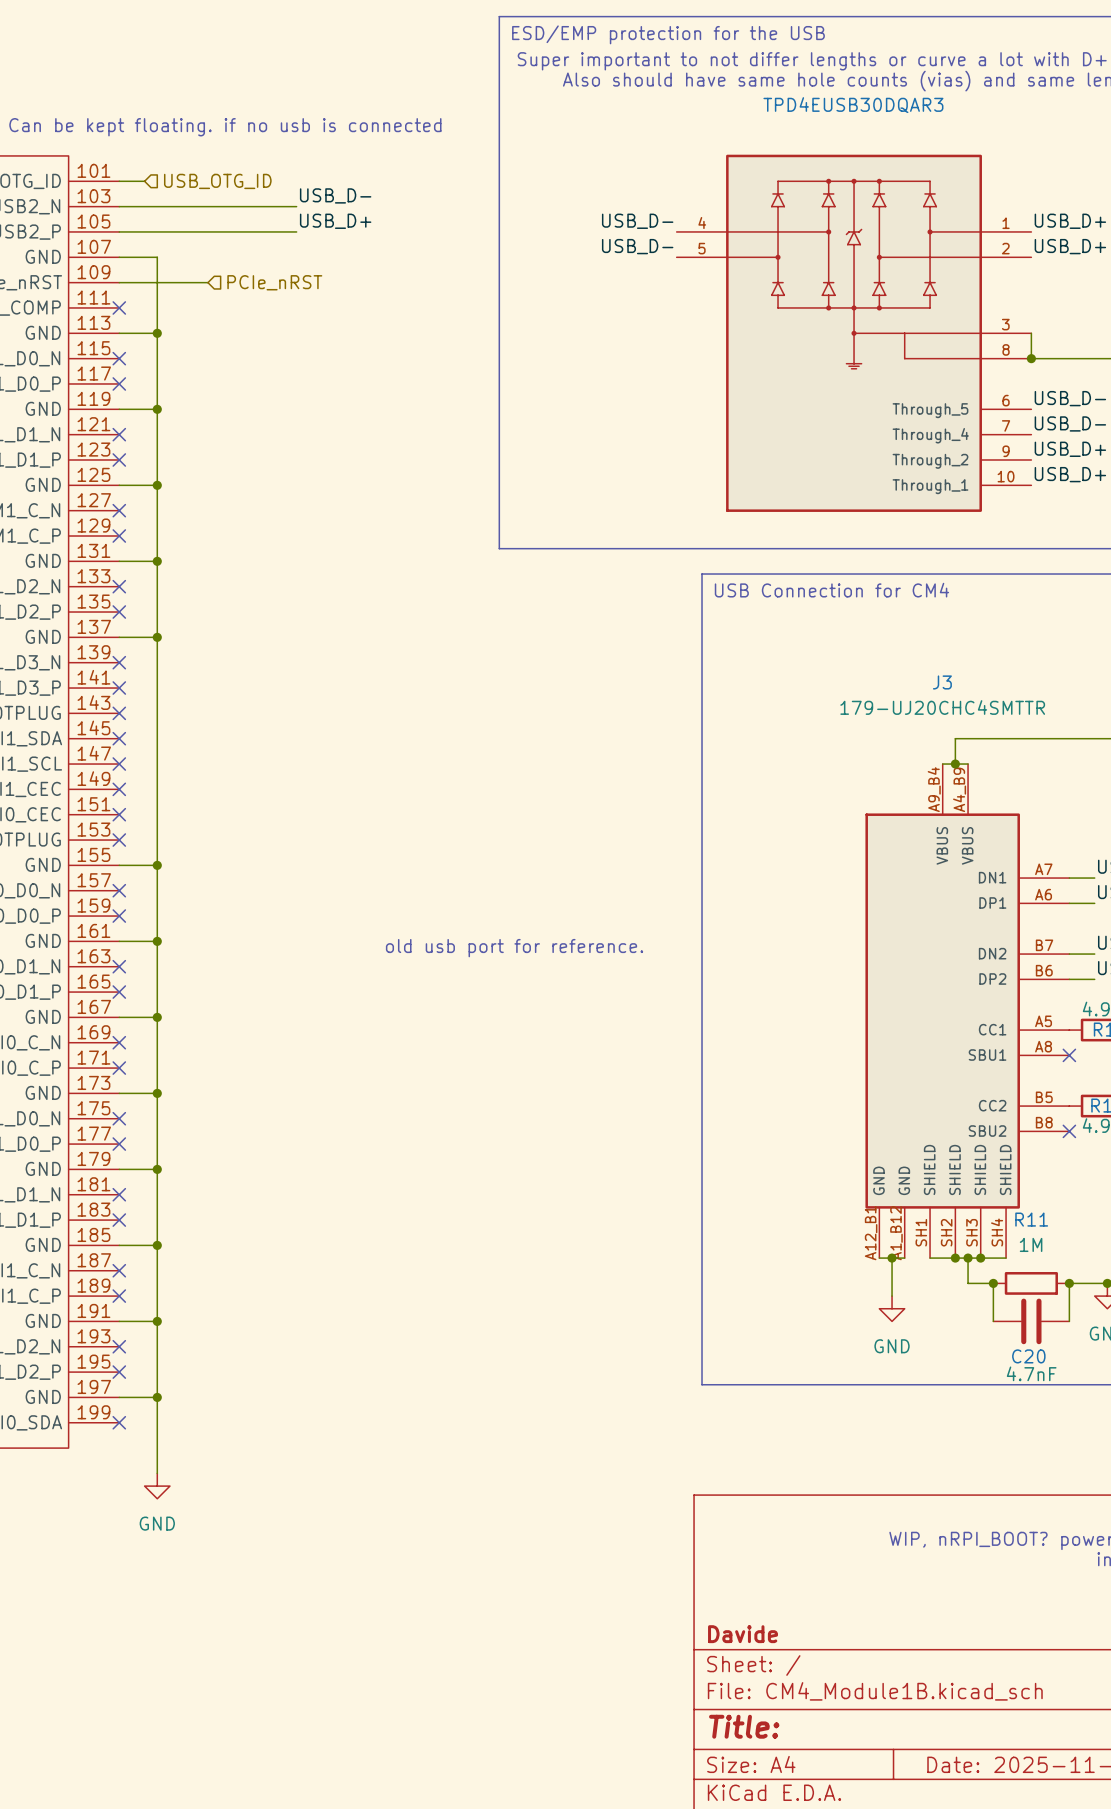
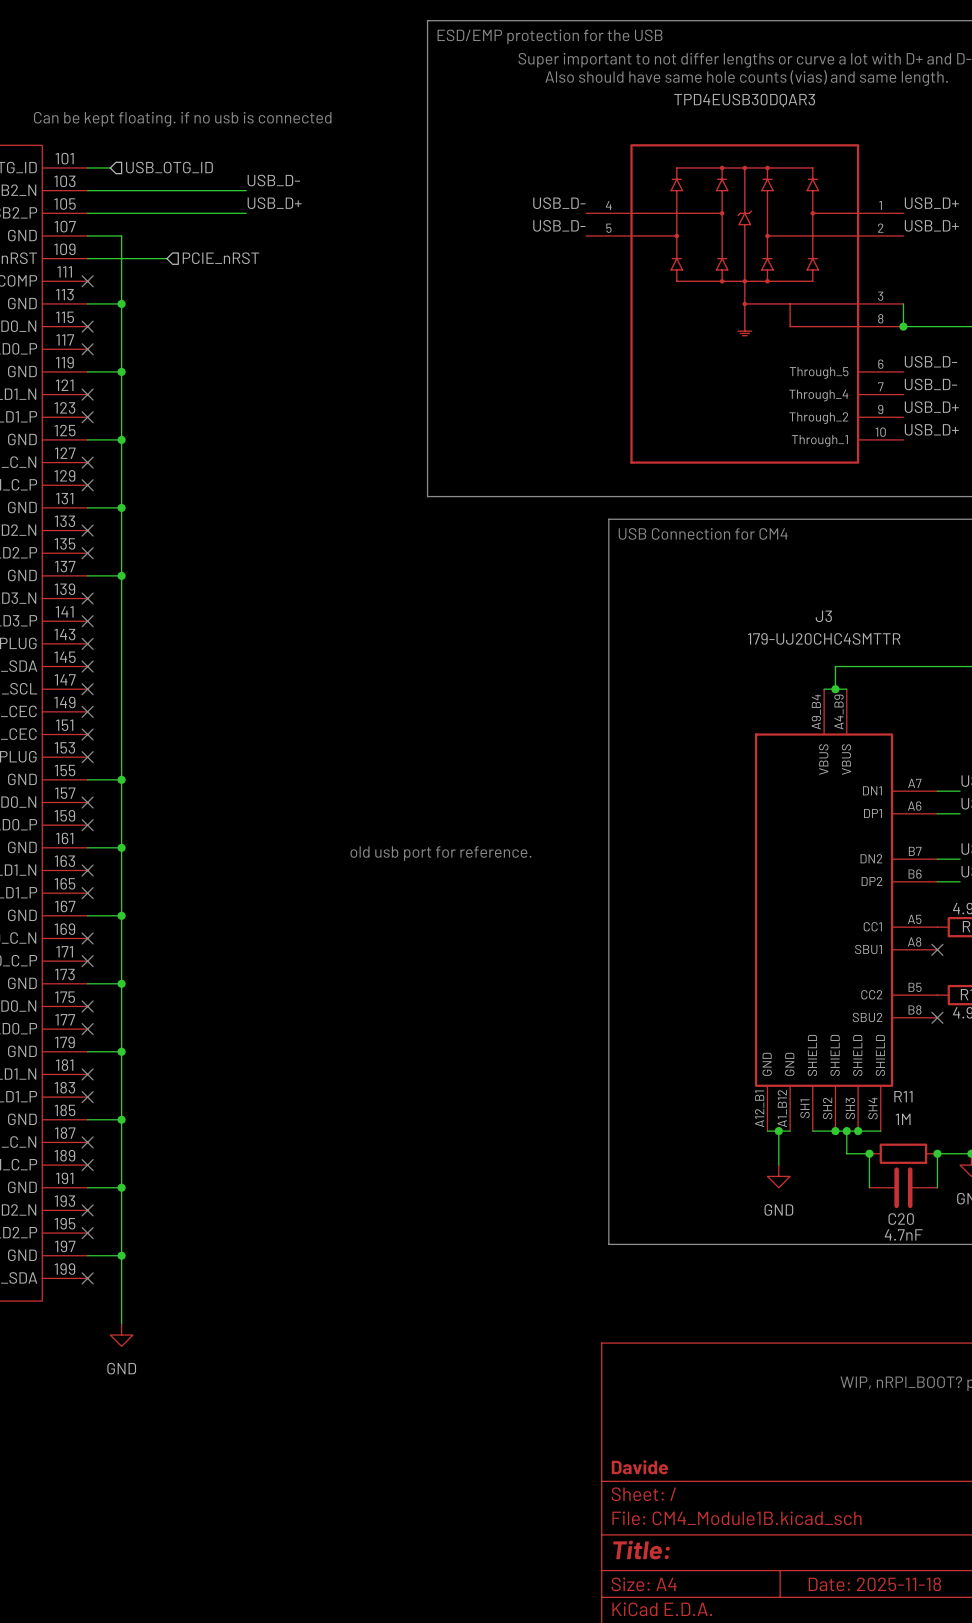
hierarchical label: PCIe_nRST (274, 282) -> PCIE_nRST (220, 258)

